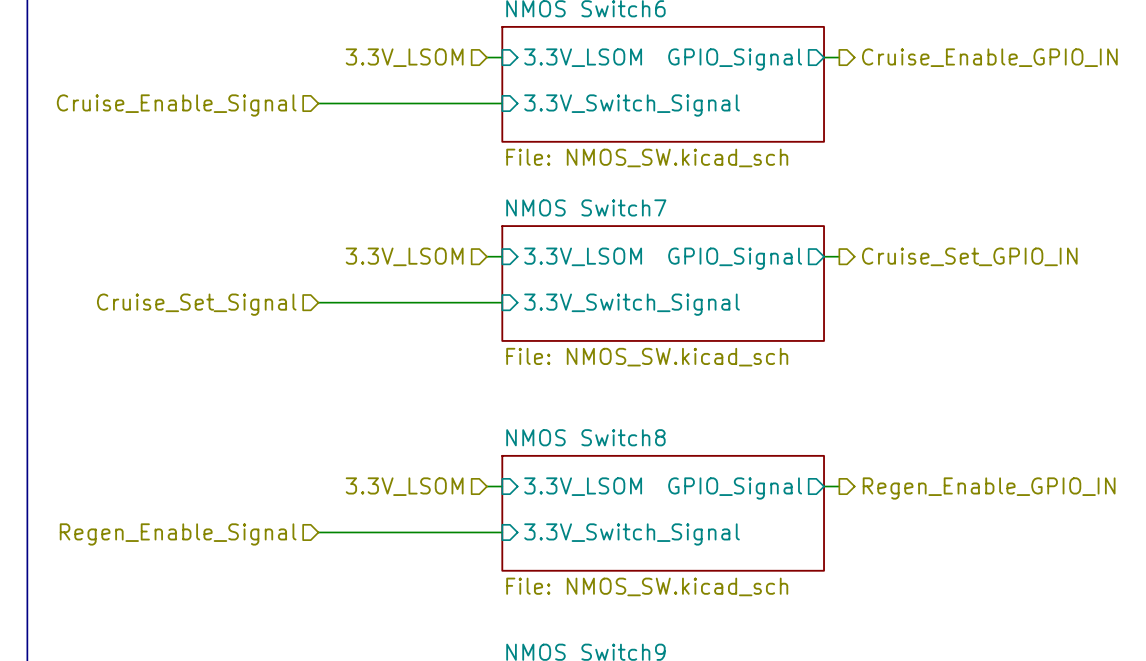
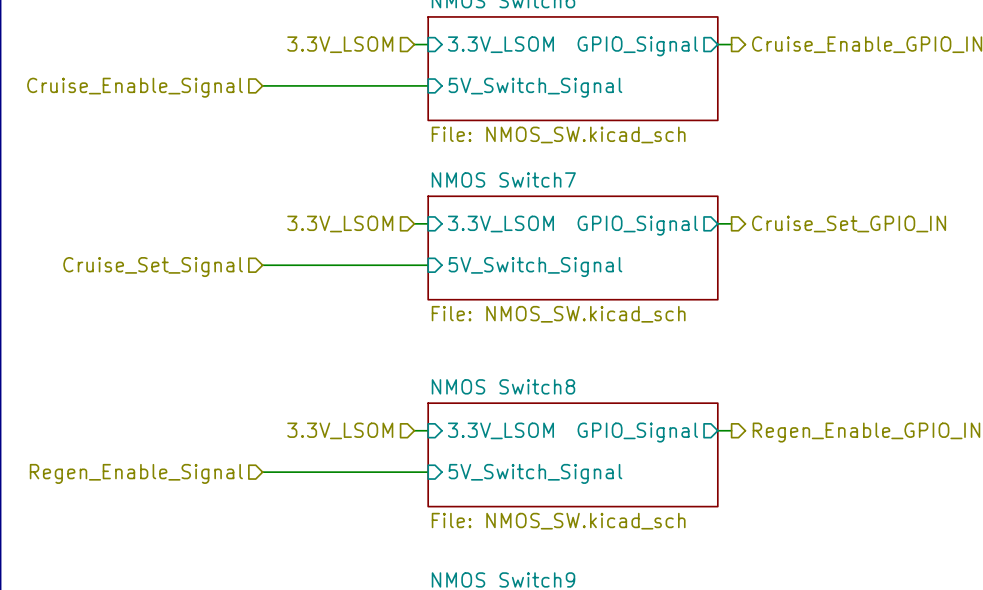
sheet pin: 3.3V_Switch_Signal (632, 105) -> 5V_Switch_Signal (535, 87)
sheet pin: 3.3V_Switch_Signal (632, 304) -> 5V_Switch_Signal (535, 267)
sheet pin: 3.3V_Switch_Signal (632, 534) -> 5V_Switch_Signal (535, 473)

